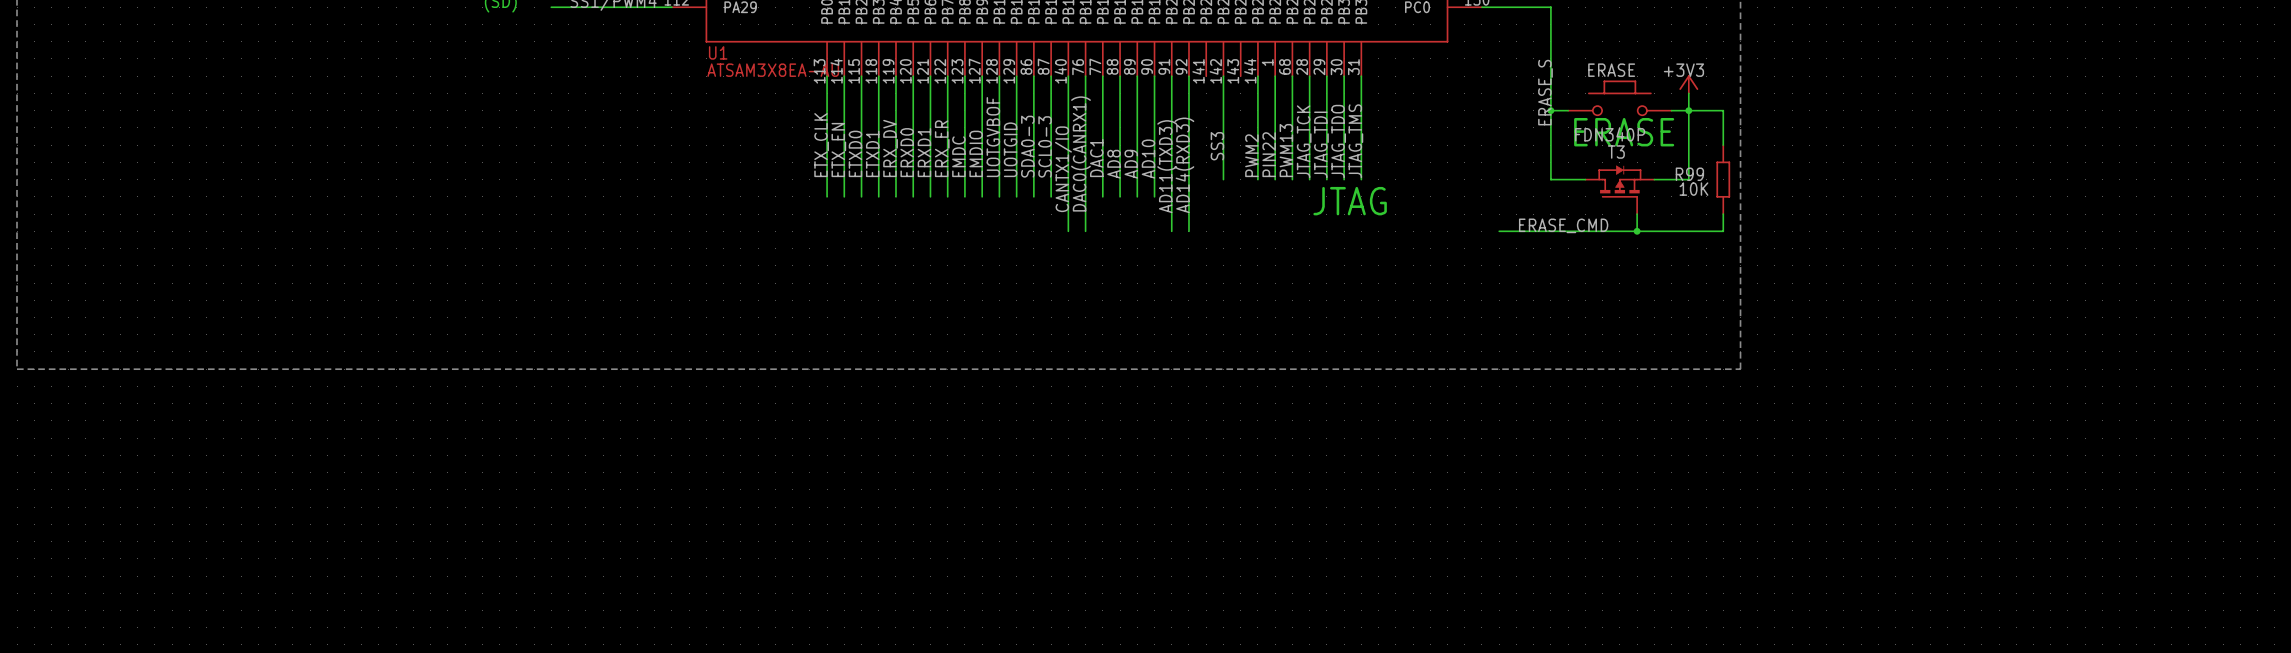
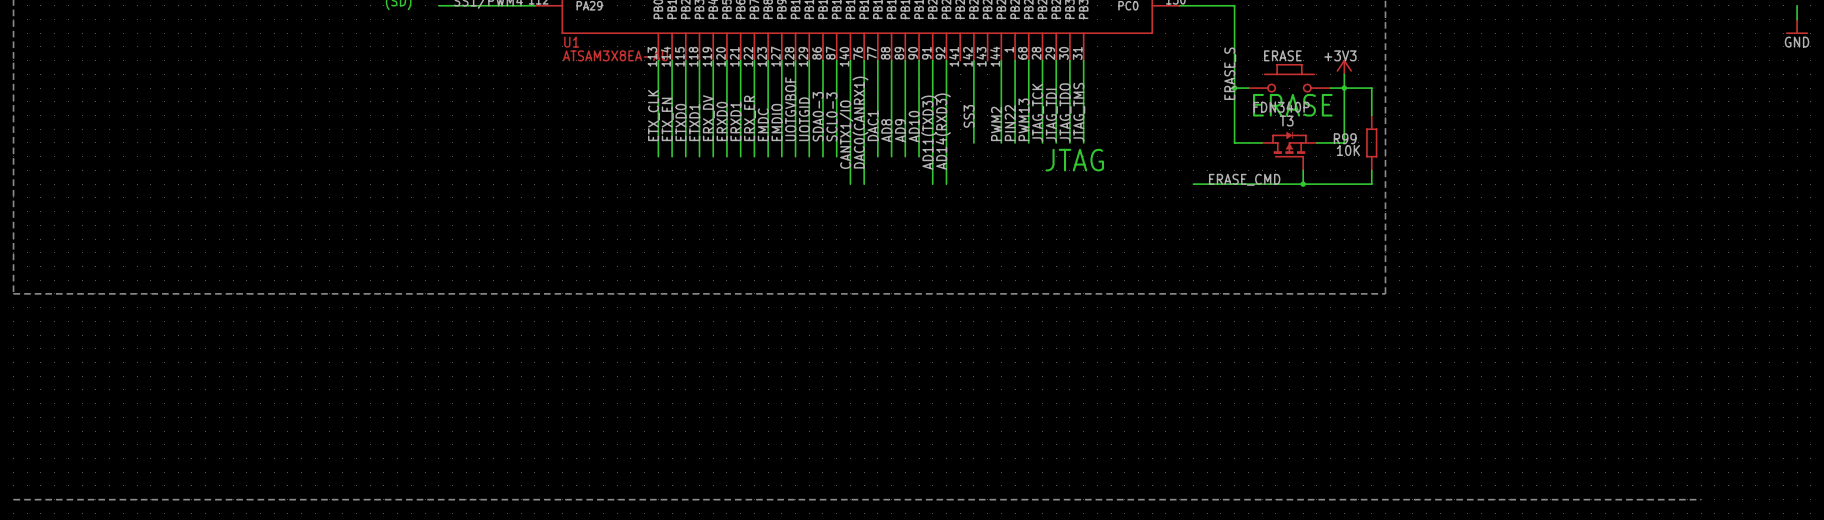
wire: none -> (1797, 5) (1797, 19)
power symbol: none -> GND (1797, 26)
line: none -> (13, 499) (1701, 499)

